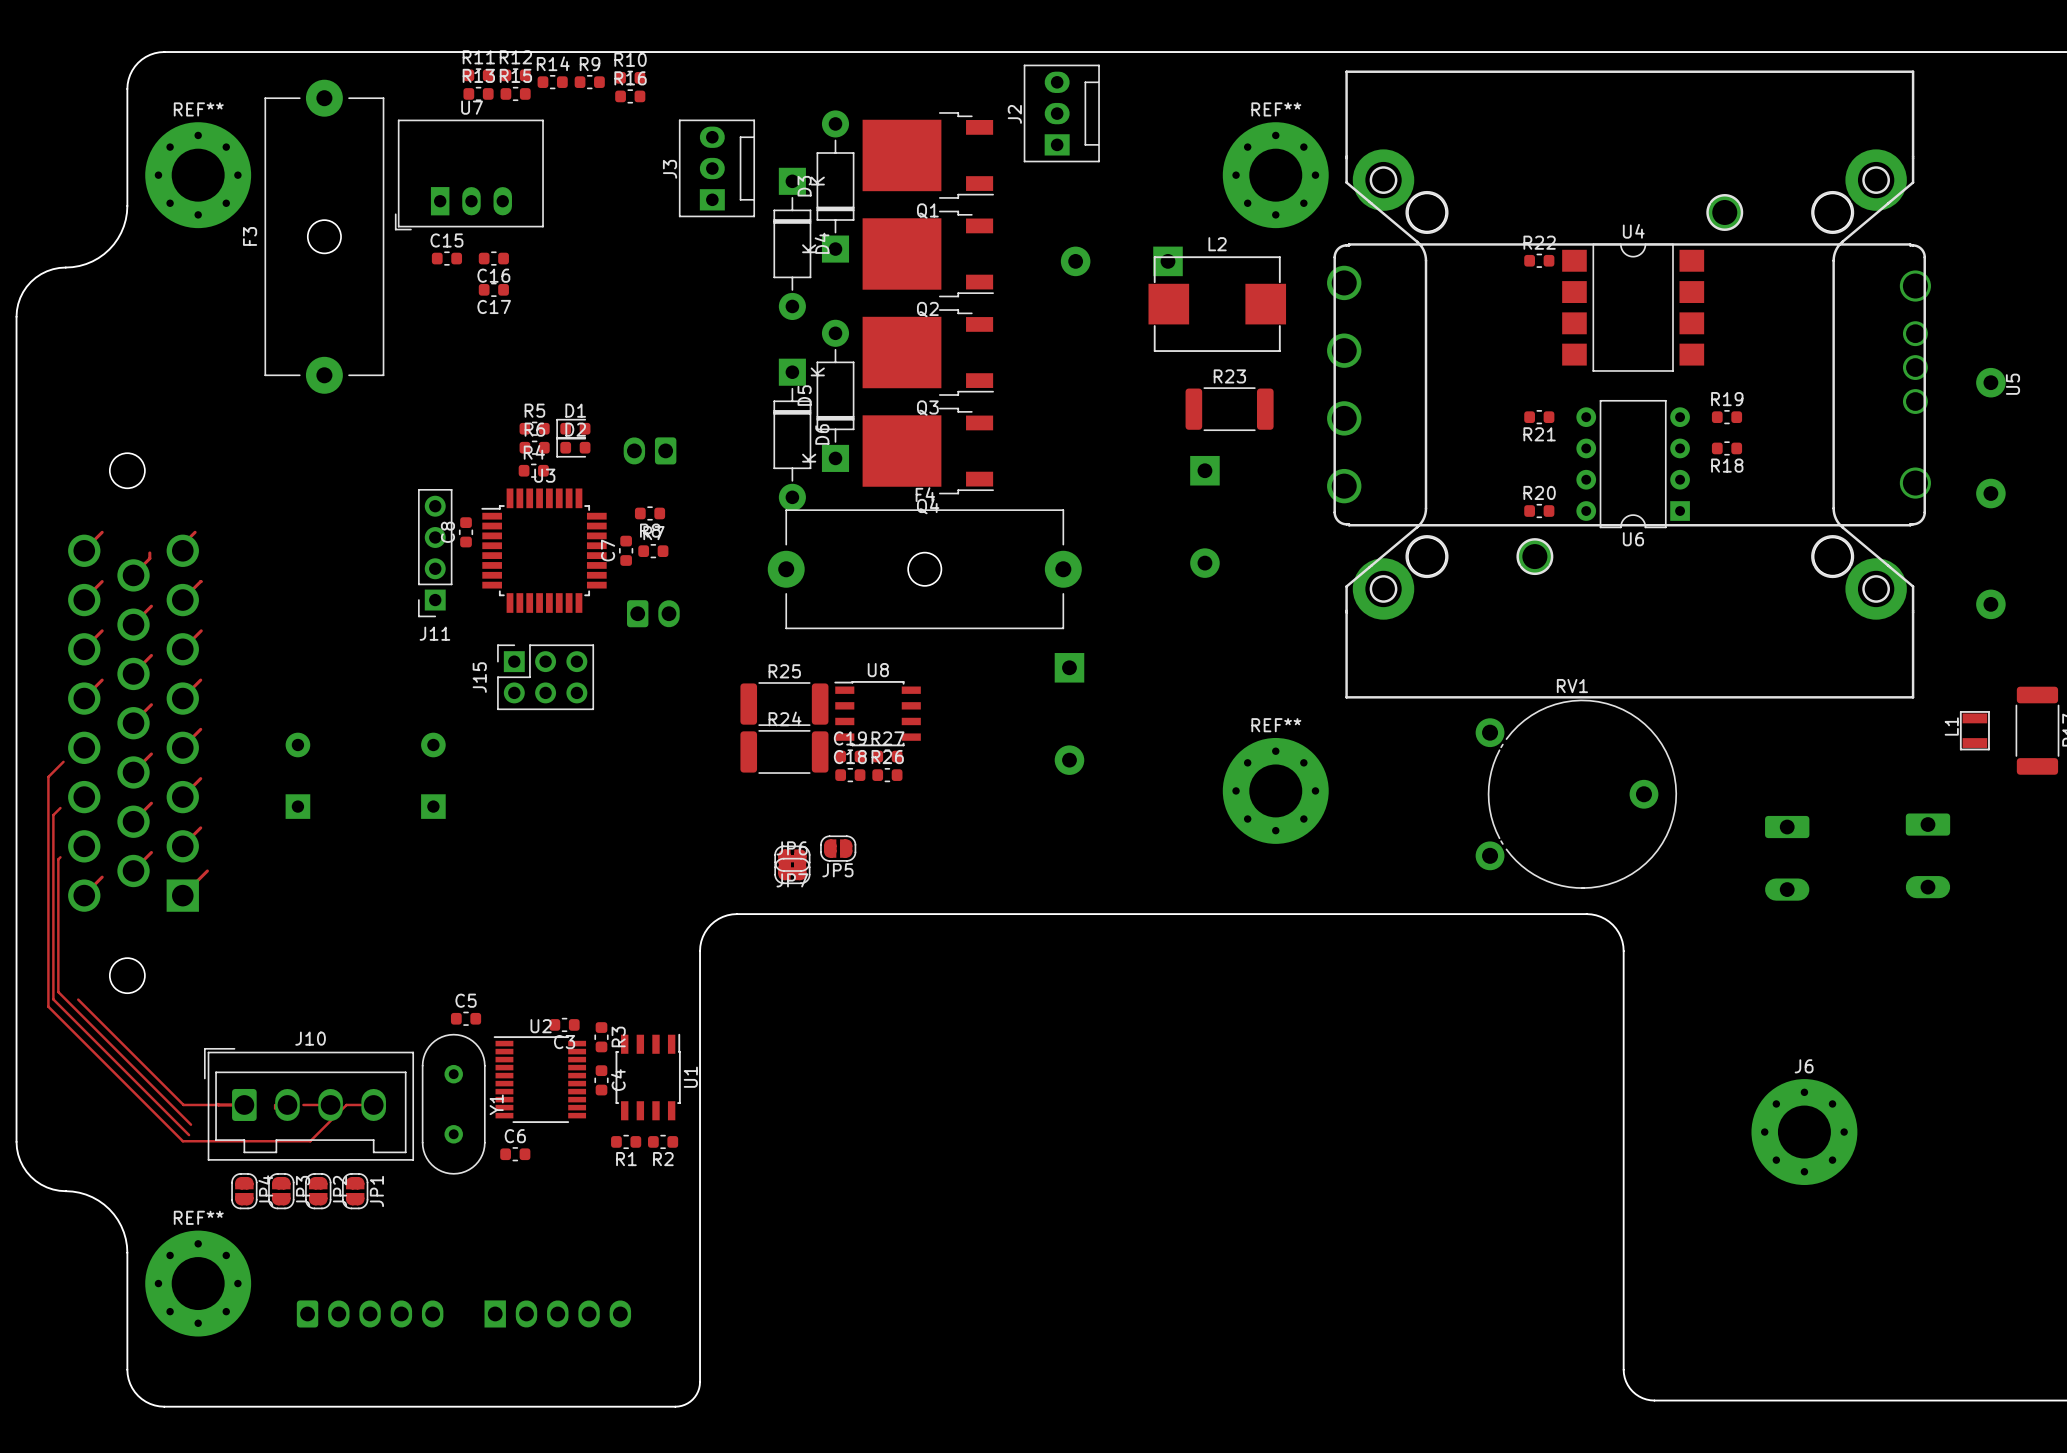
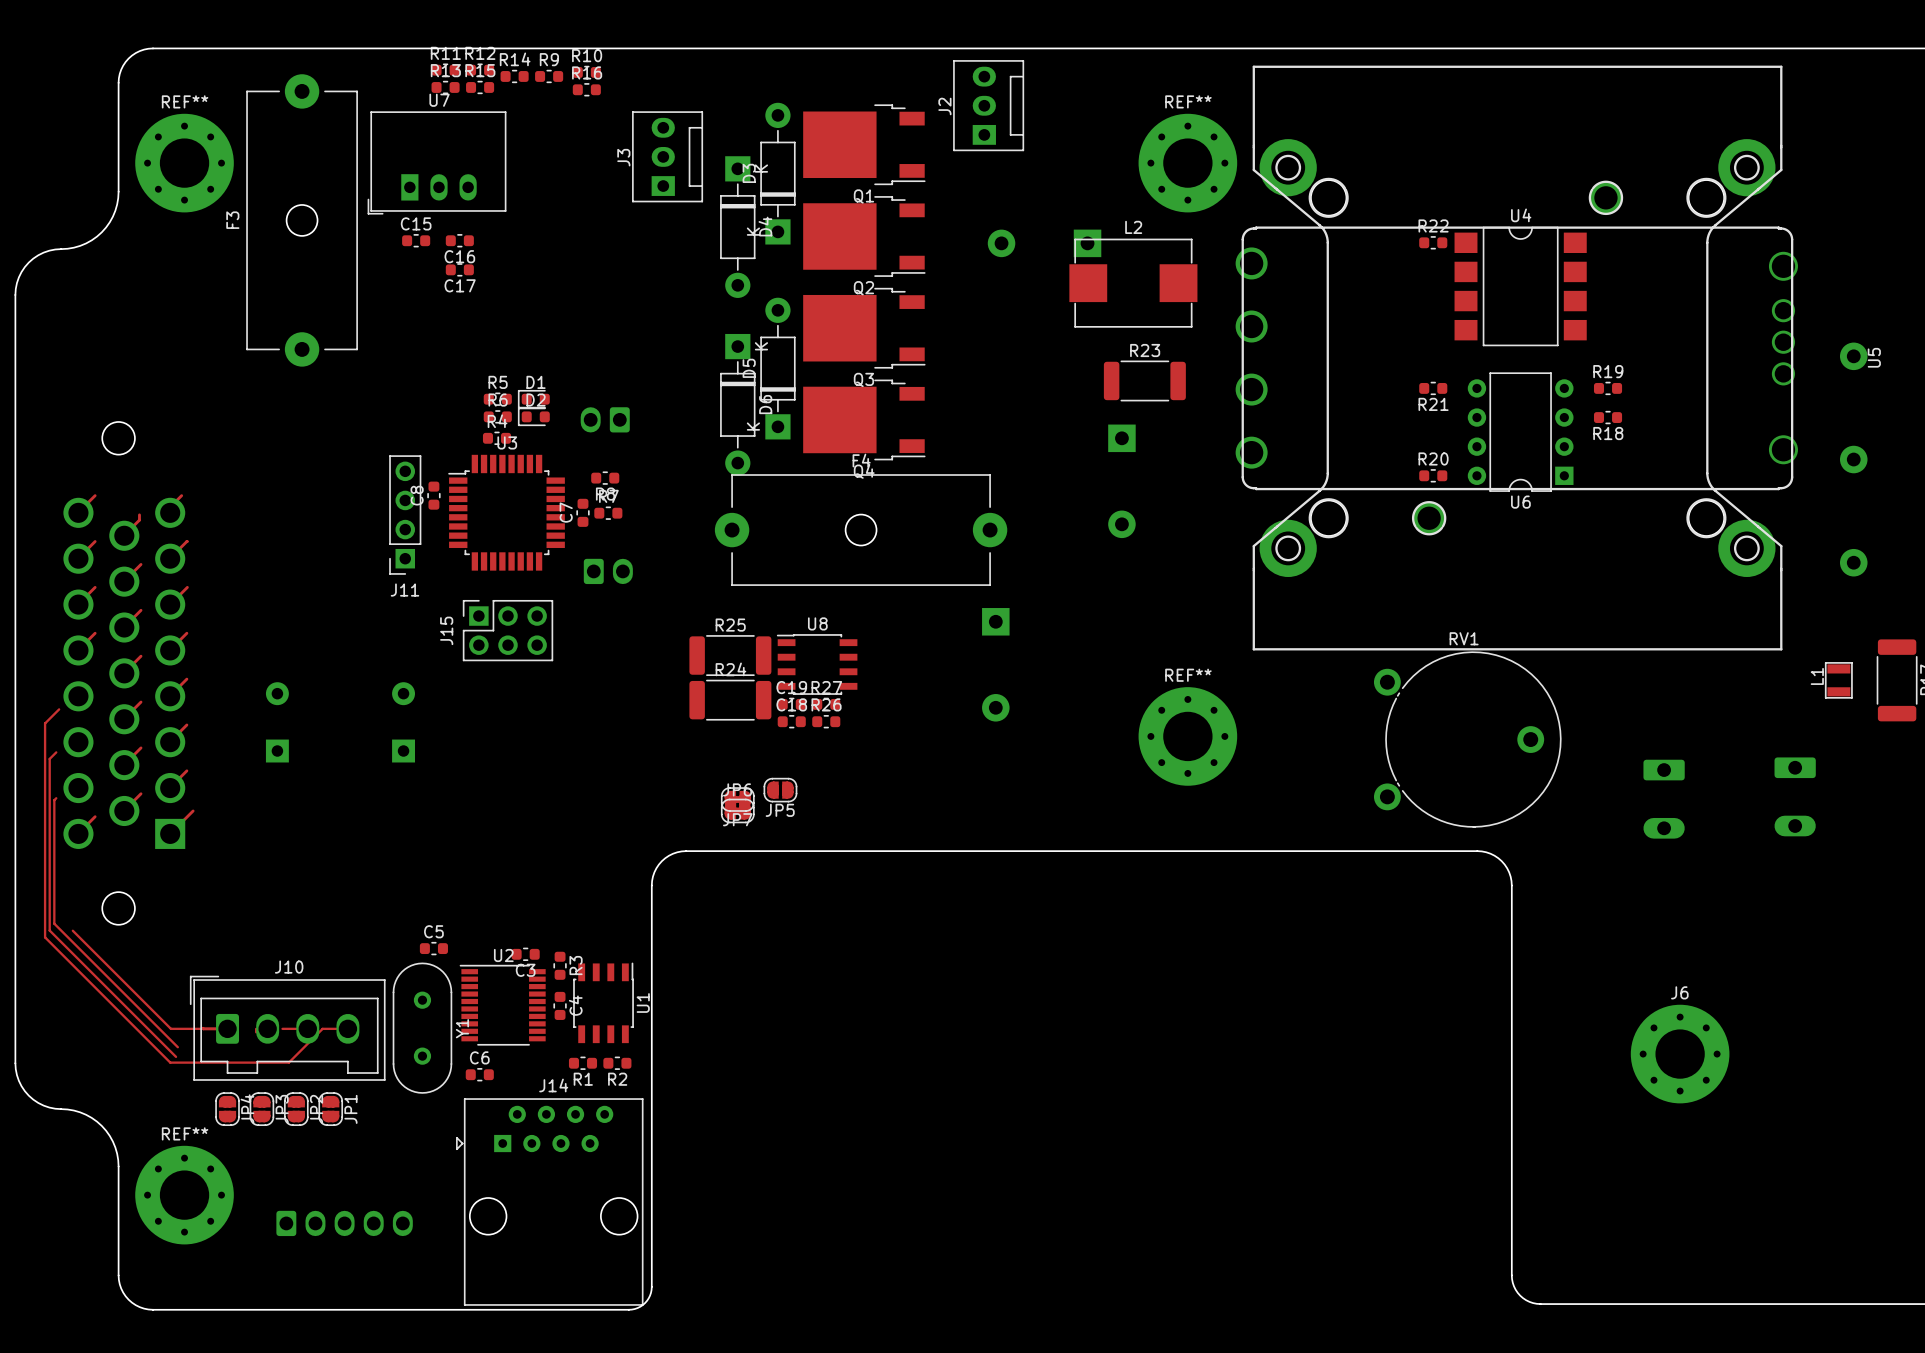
J14: none -> (549, 1202)
part: (557, 1313) -> none

